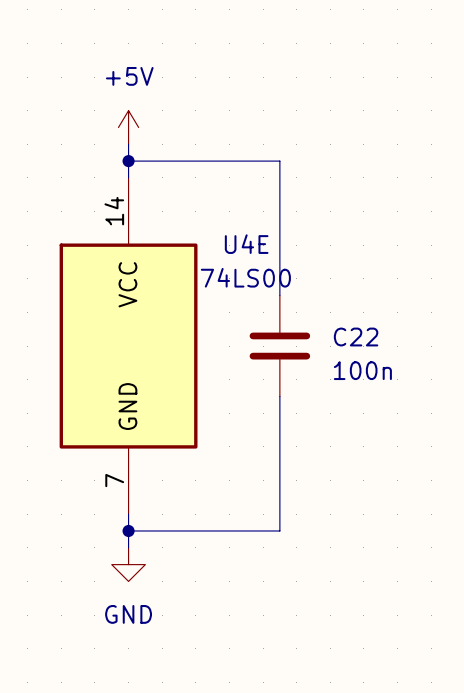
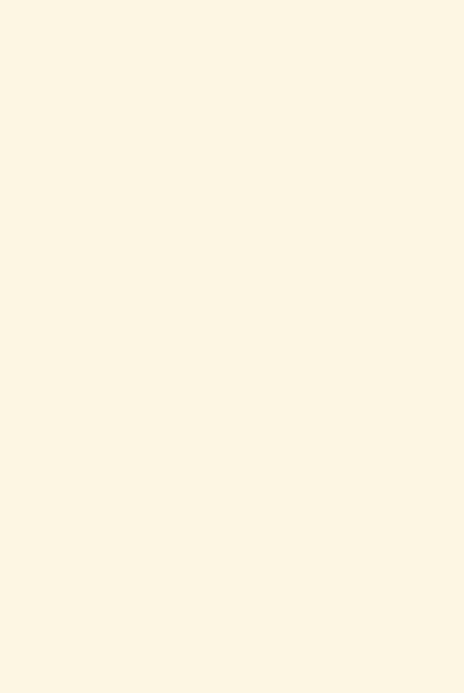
power symbol: +5V (128, 127) -> none
wire: (128, 144) (128, 177) -> none
wire: (128, 161) (279, 161) (279, 295) -> none
junction: (128, 161) -> none
U4E: 74LS00 (128, 346) -> none
C22: 100n (279, 346) -> none
wire: (279, 396) (279, 530) (128, 530) -> none
wire: (128, 514) (128, 547) -> none
junction: (128, 530) -> none
power symbol: GND (128, 564) -> none

